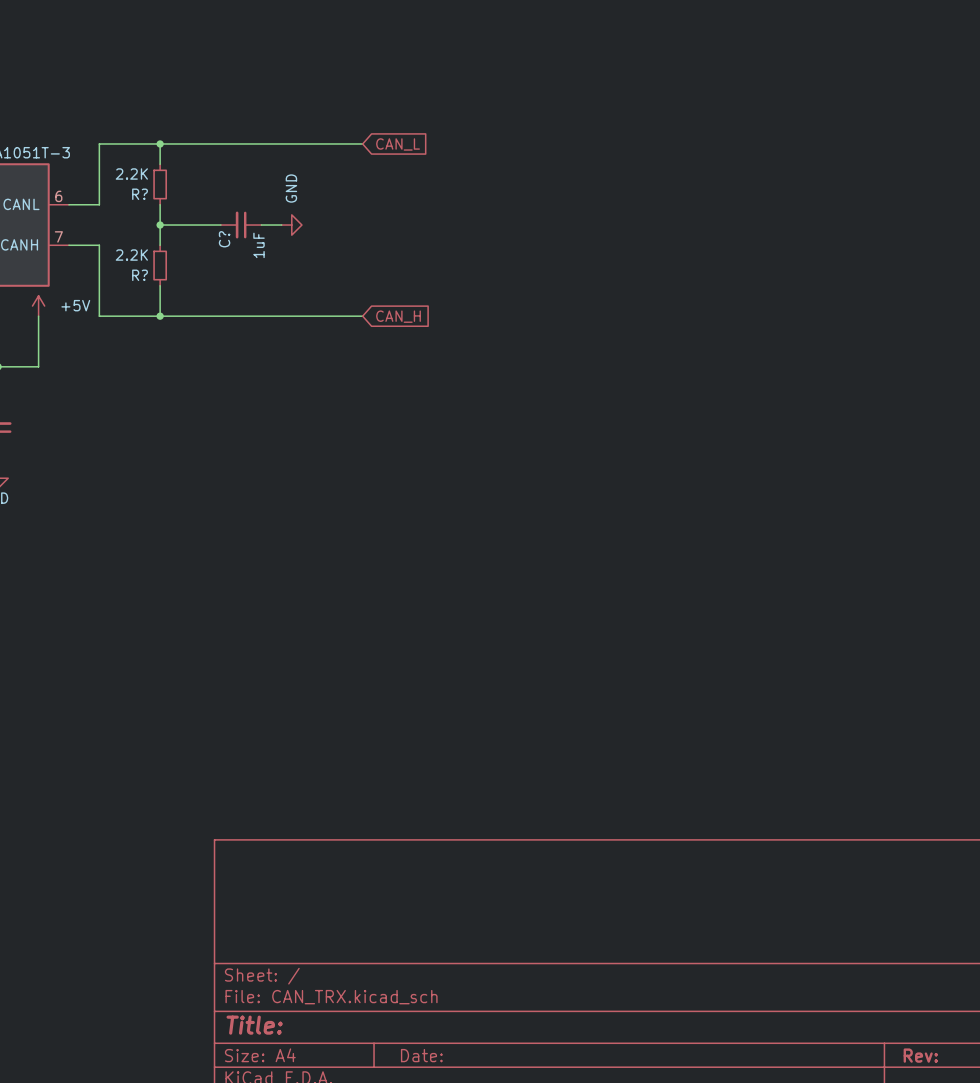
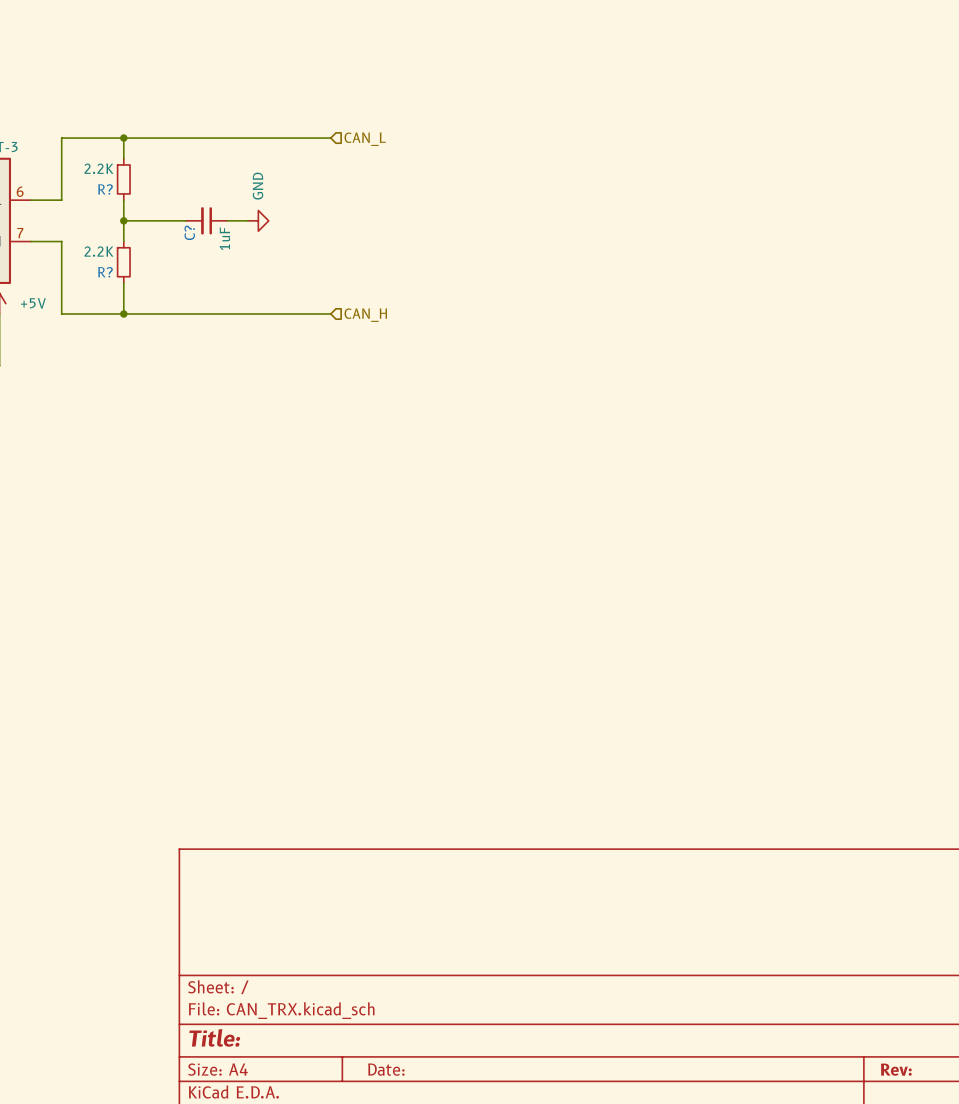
global label: CAN_L (398, 144) -> none
hierarchical label: none -> CAN_L (365, 139)
global label: CAN_H (398, 316) -> none
hierarchical label: none -> CAN_H (365, 315)

